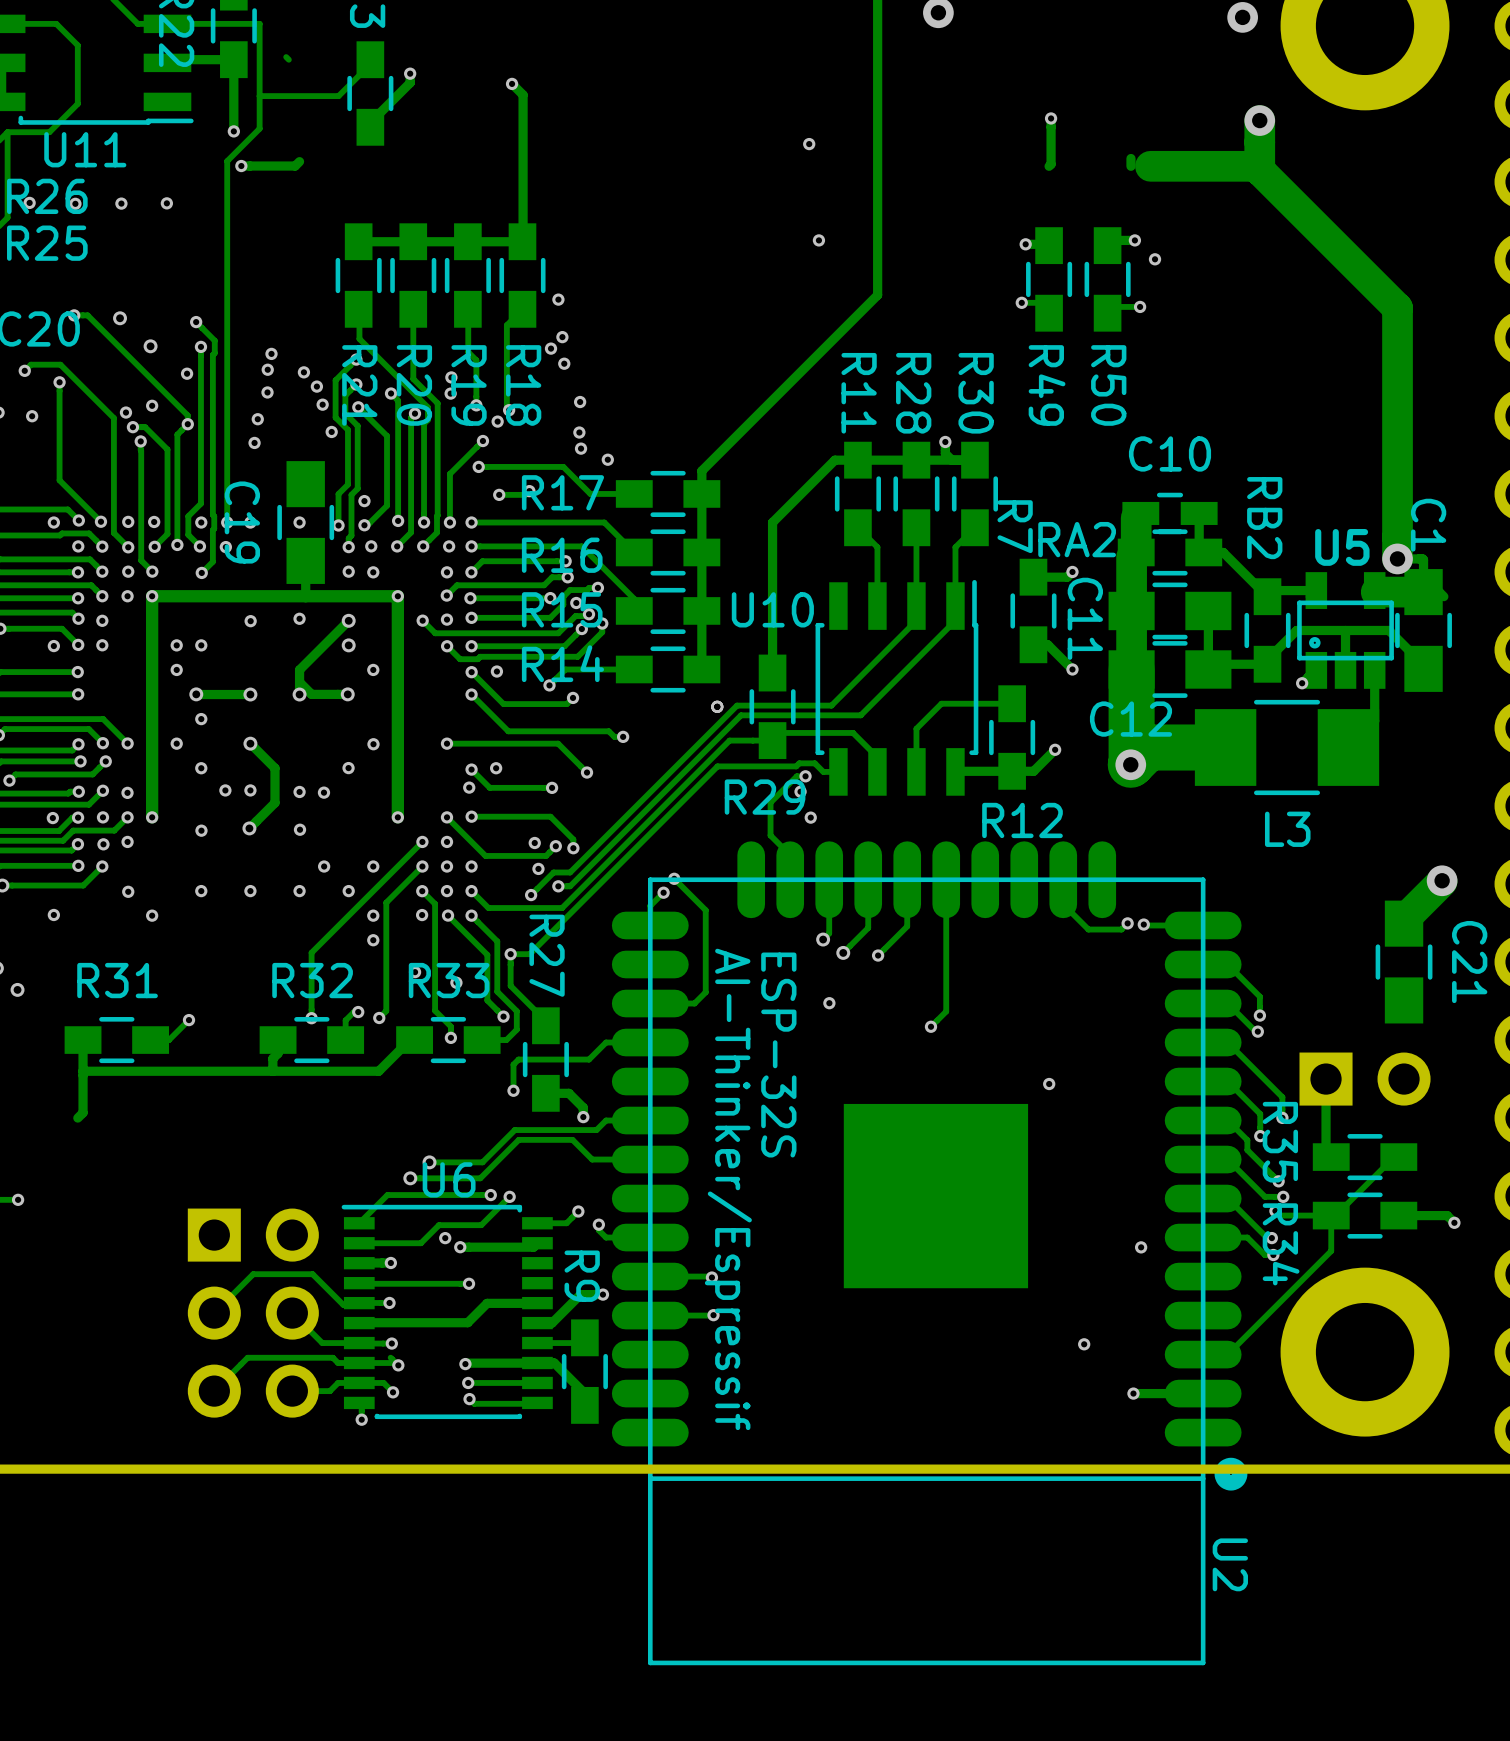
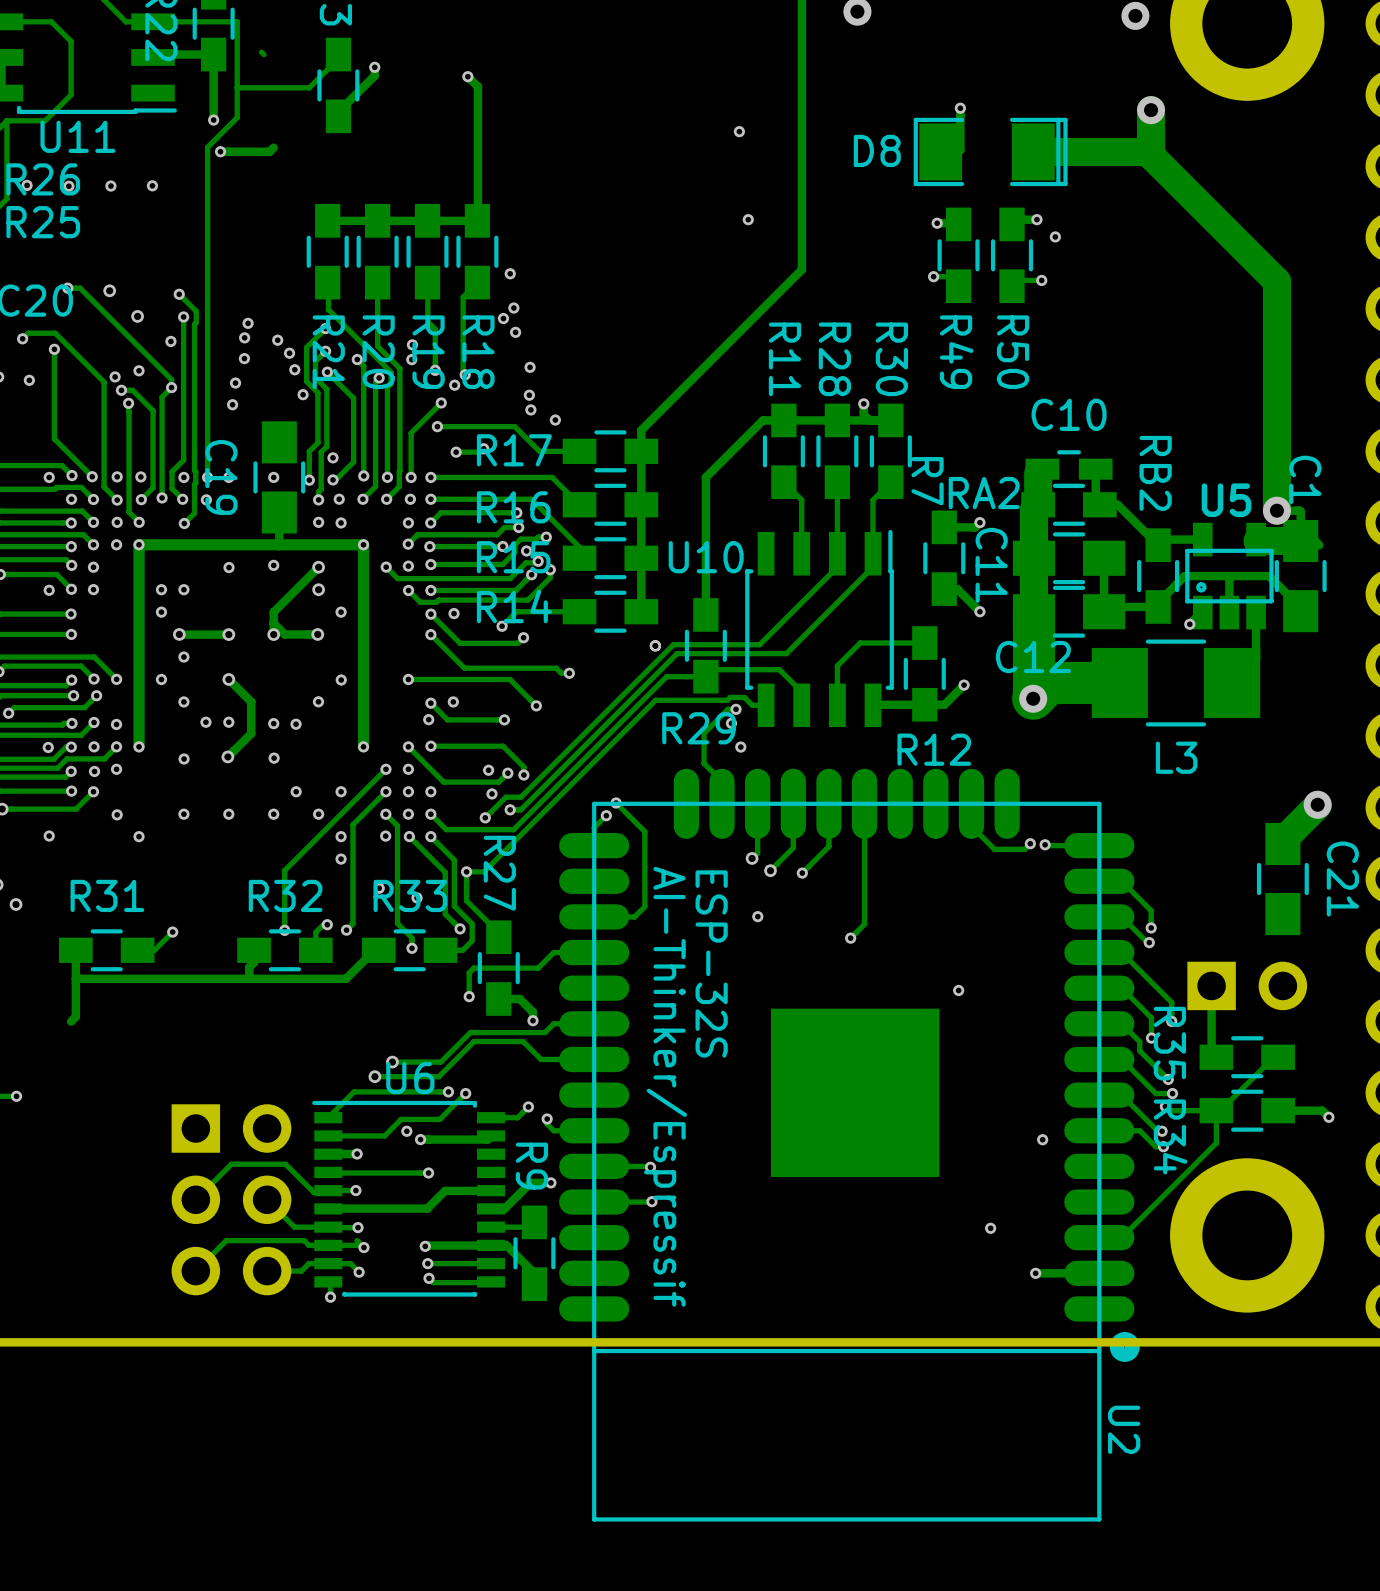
D8: none -> (990, 151)

